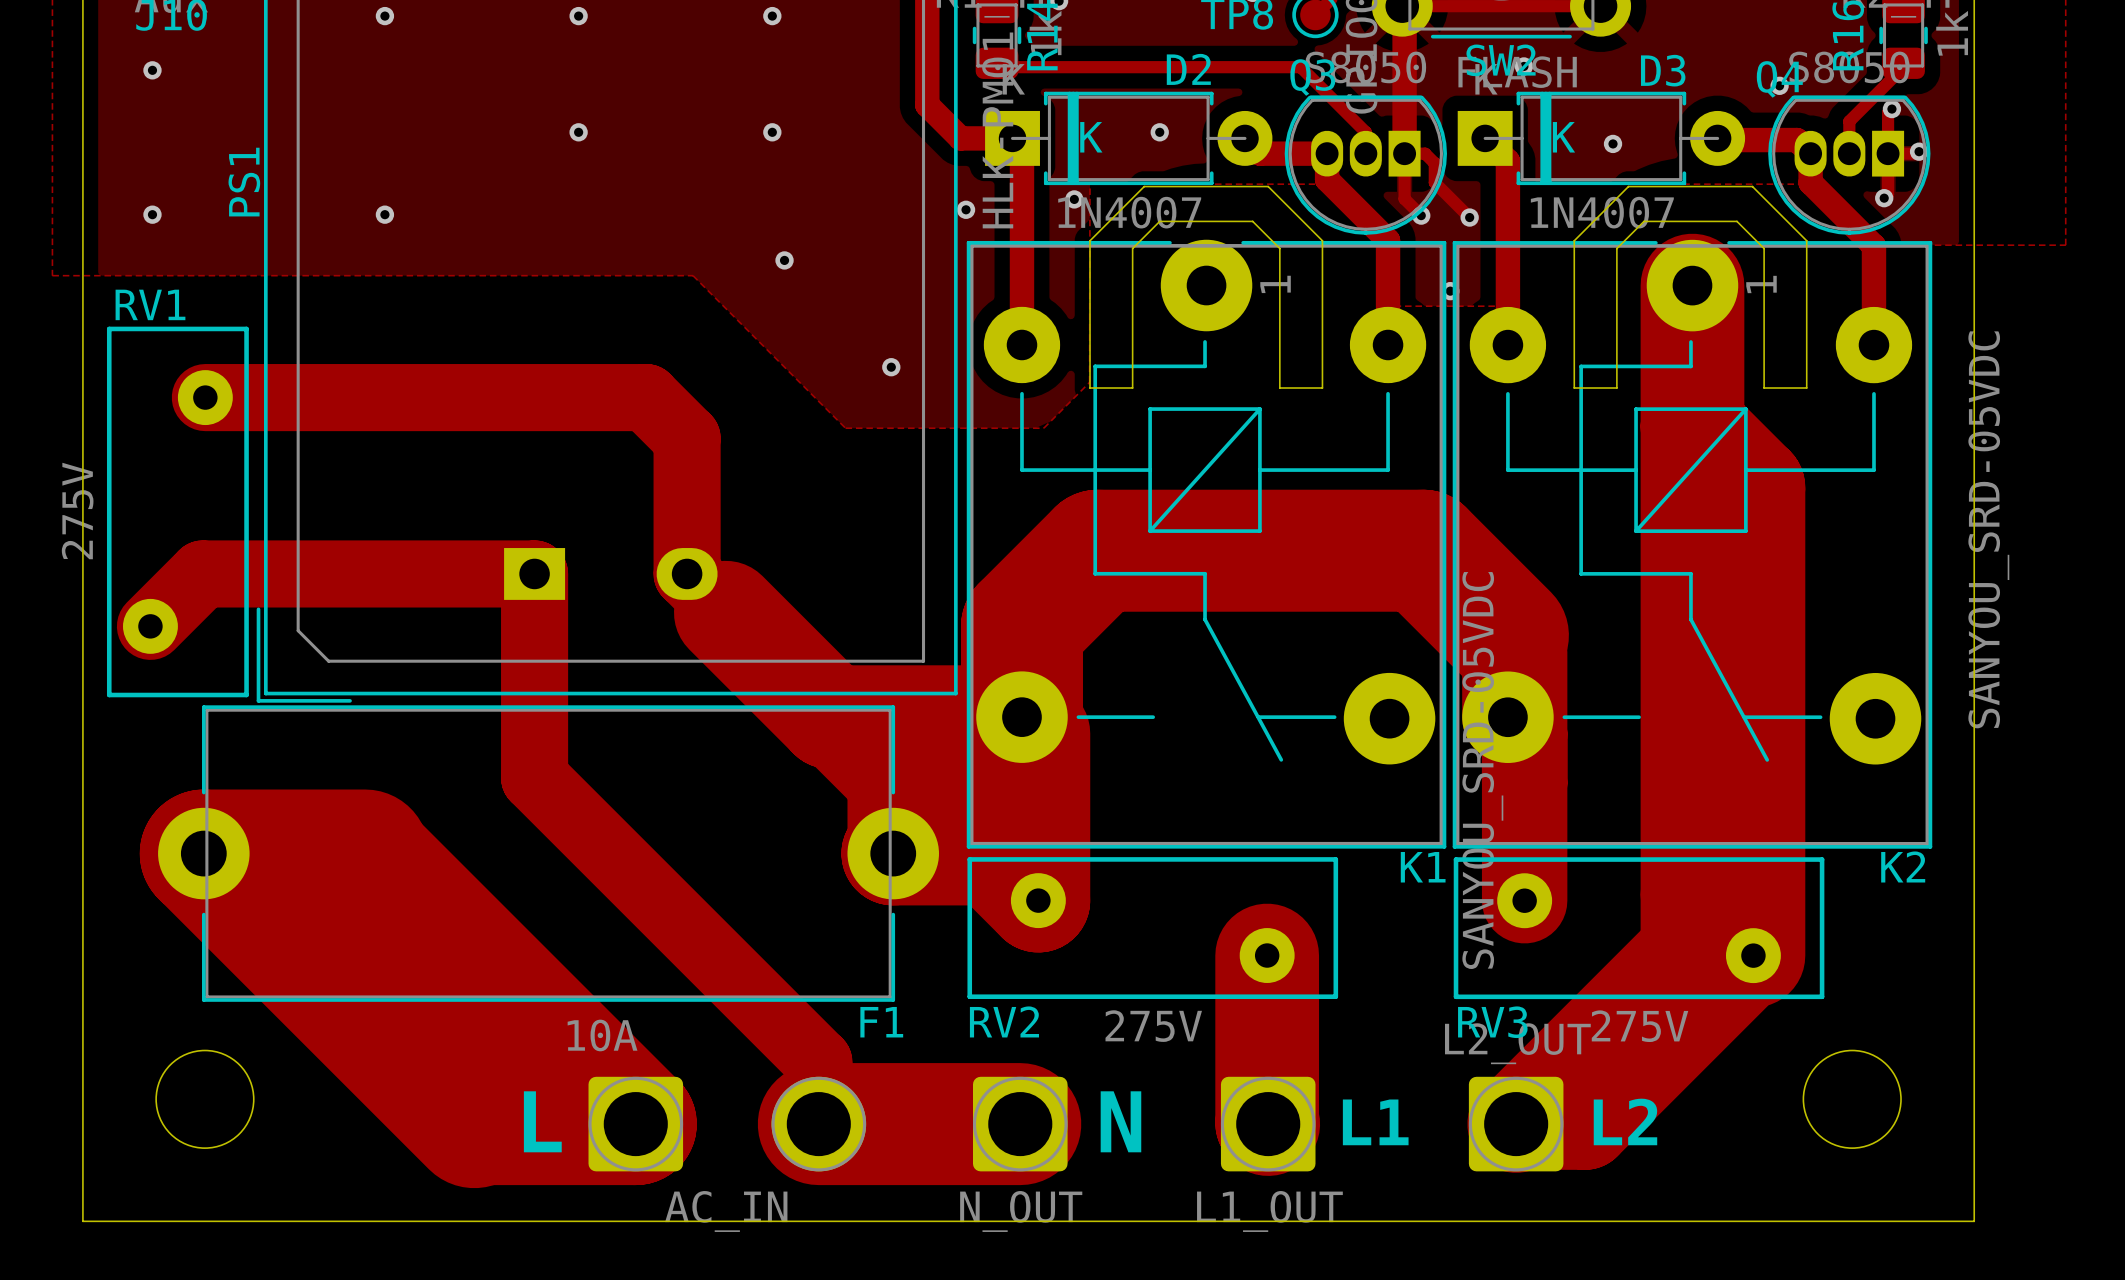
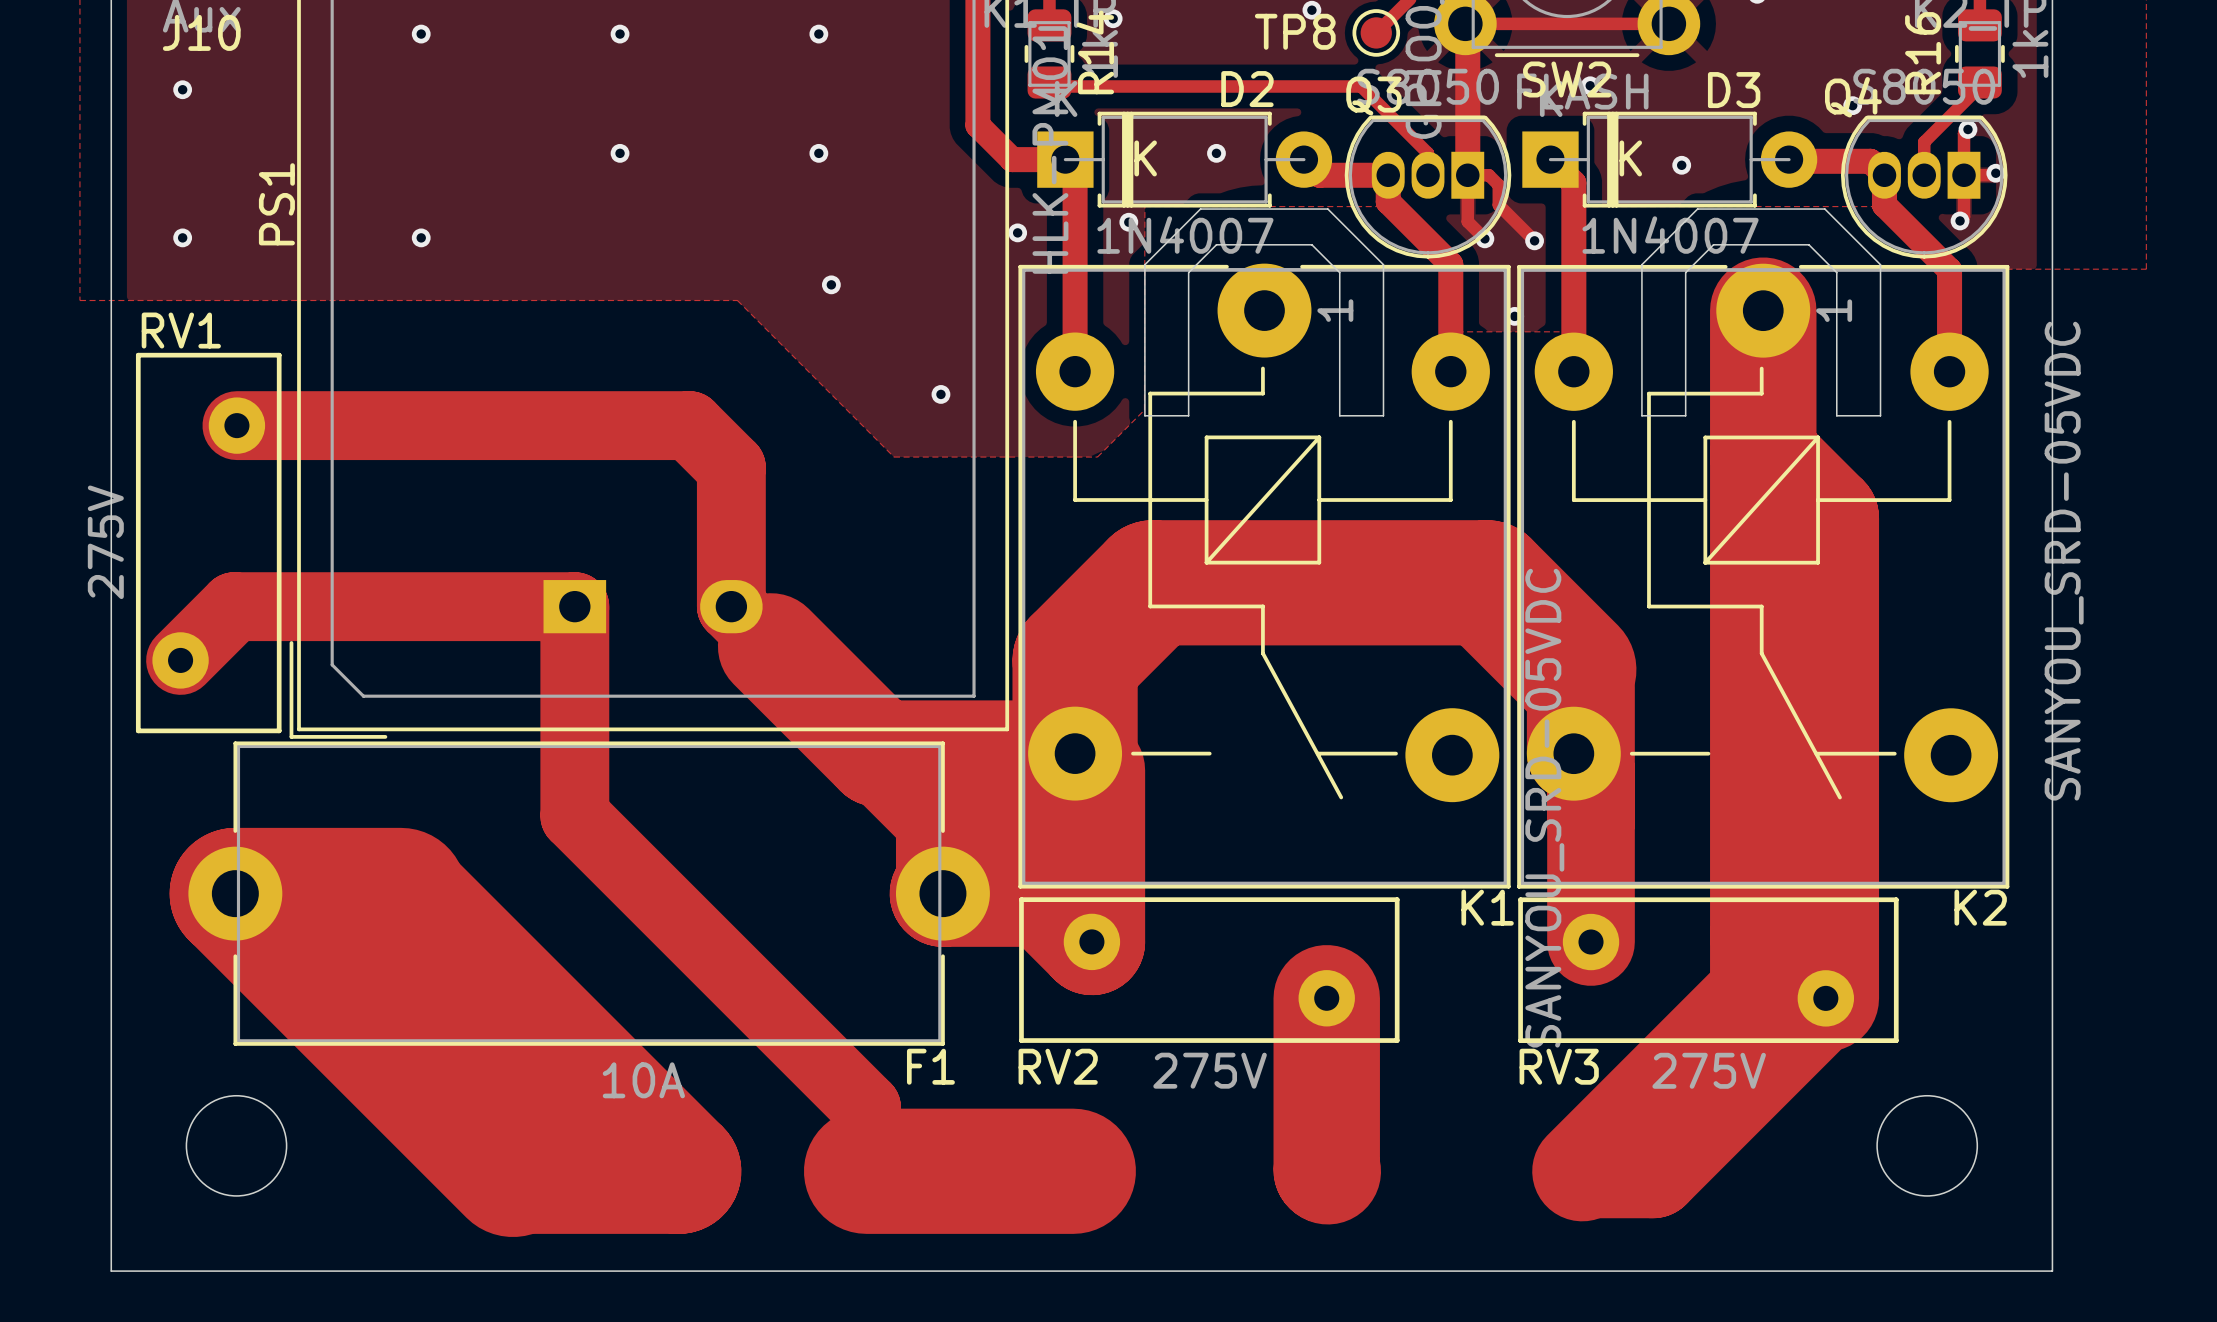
L: AC_IN (727, 1124) -> none
N: N_OUT (1020, 1124) -> none
L1: L1_OUT (1268, 1124) -> none
L2: L2_OUT (1516, 1124) -> none

